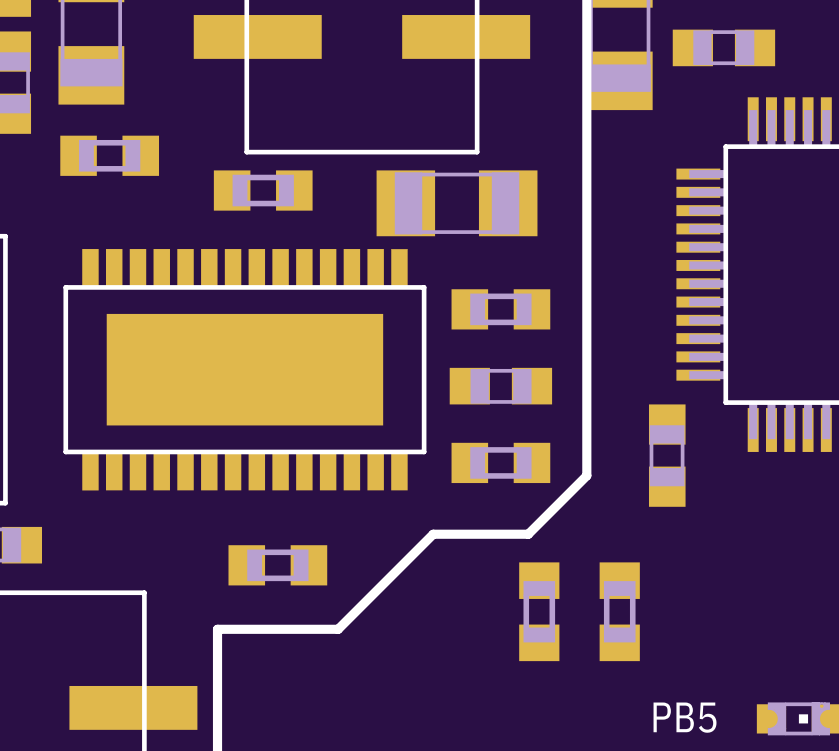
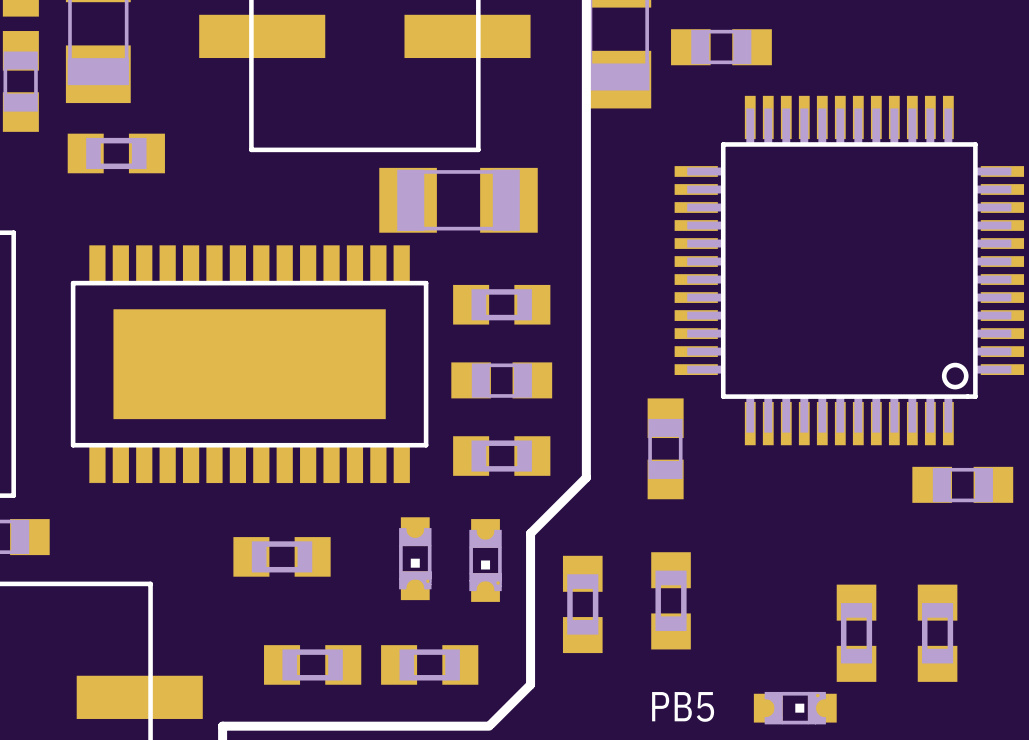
part: (263, 190) -> none
line: (586, 475) (528, 534) (433, 534) (338, 629) (217, 629) (217, 737) -> (586, 468) (586, 477) (530, 533) (530, 684) (490, 724)
part: none -> (415, 558)
part: none -> (485, 560)
part: none -> (671, 600)
part: (539, 611) -> none
part: (619, 611) -> none
part: none -> (582, 604)
part: none -> (312, 664)
part: none -> (429, 664)
line: none -> (222, 726) (489, 726)

